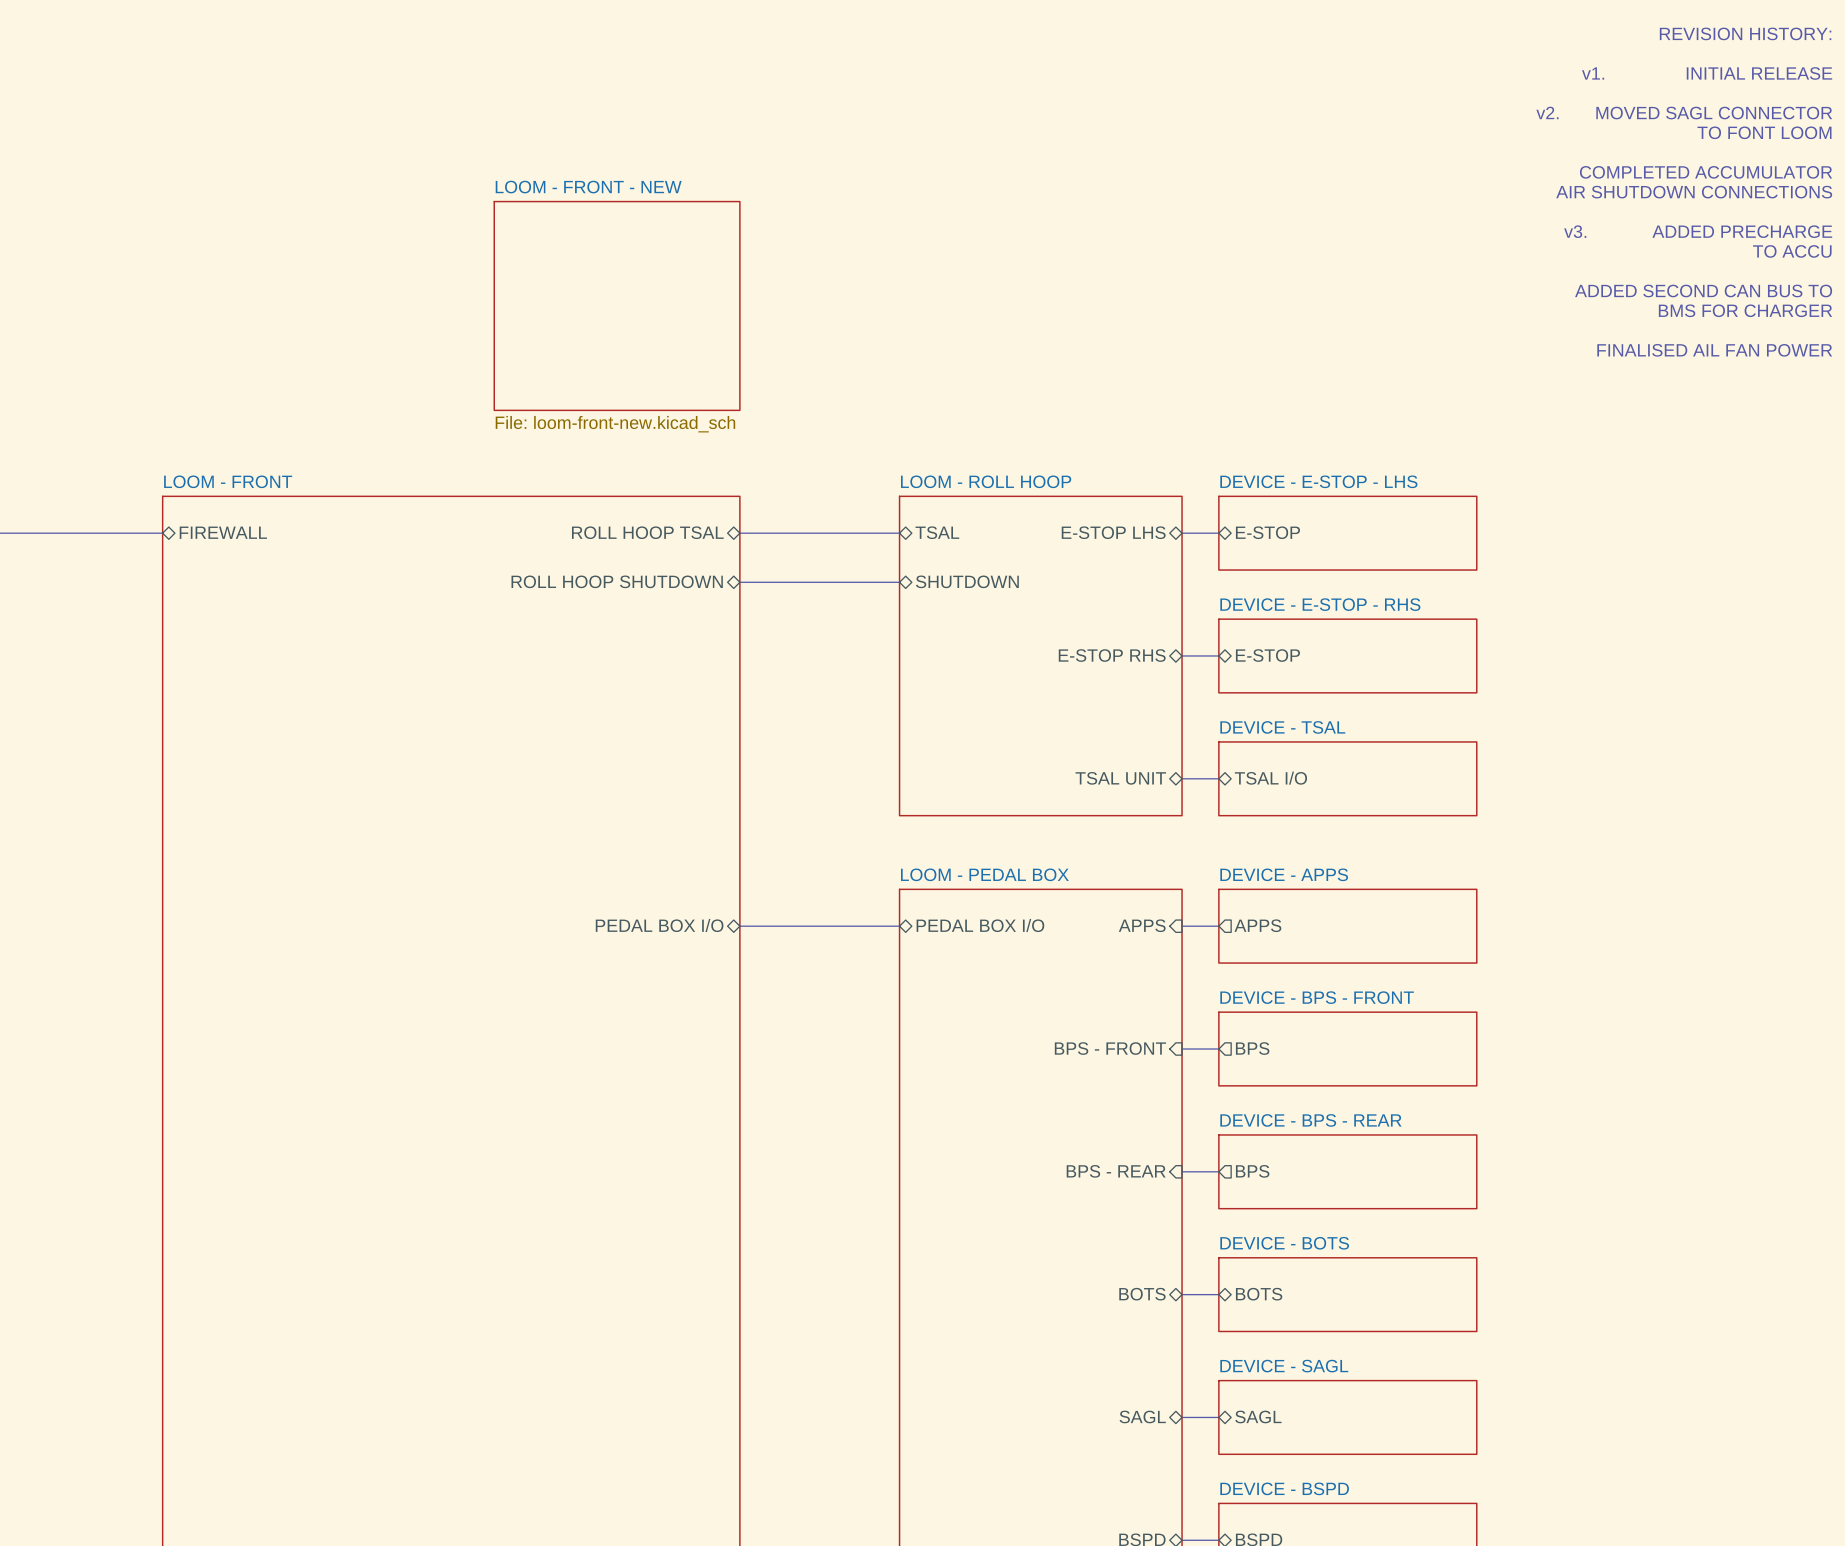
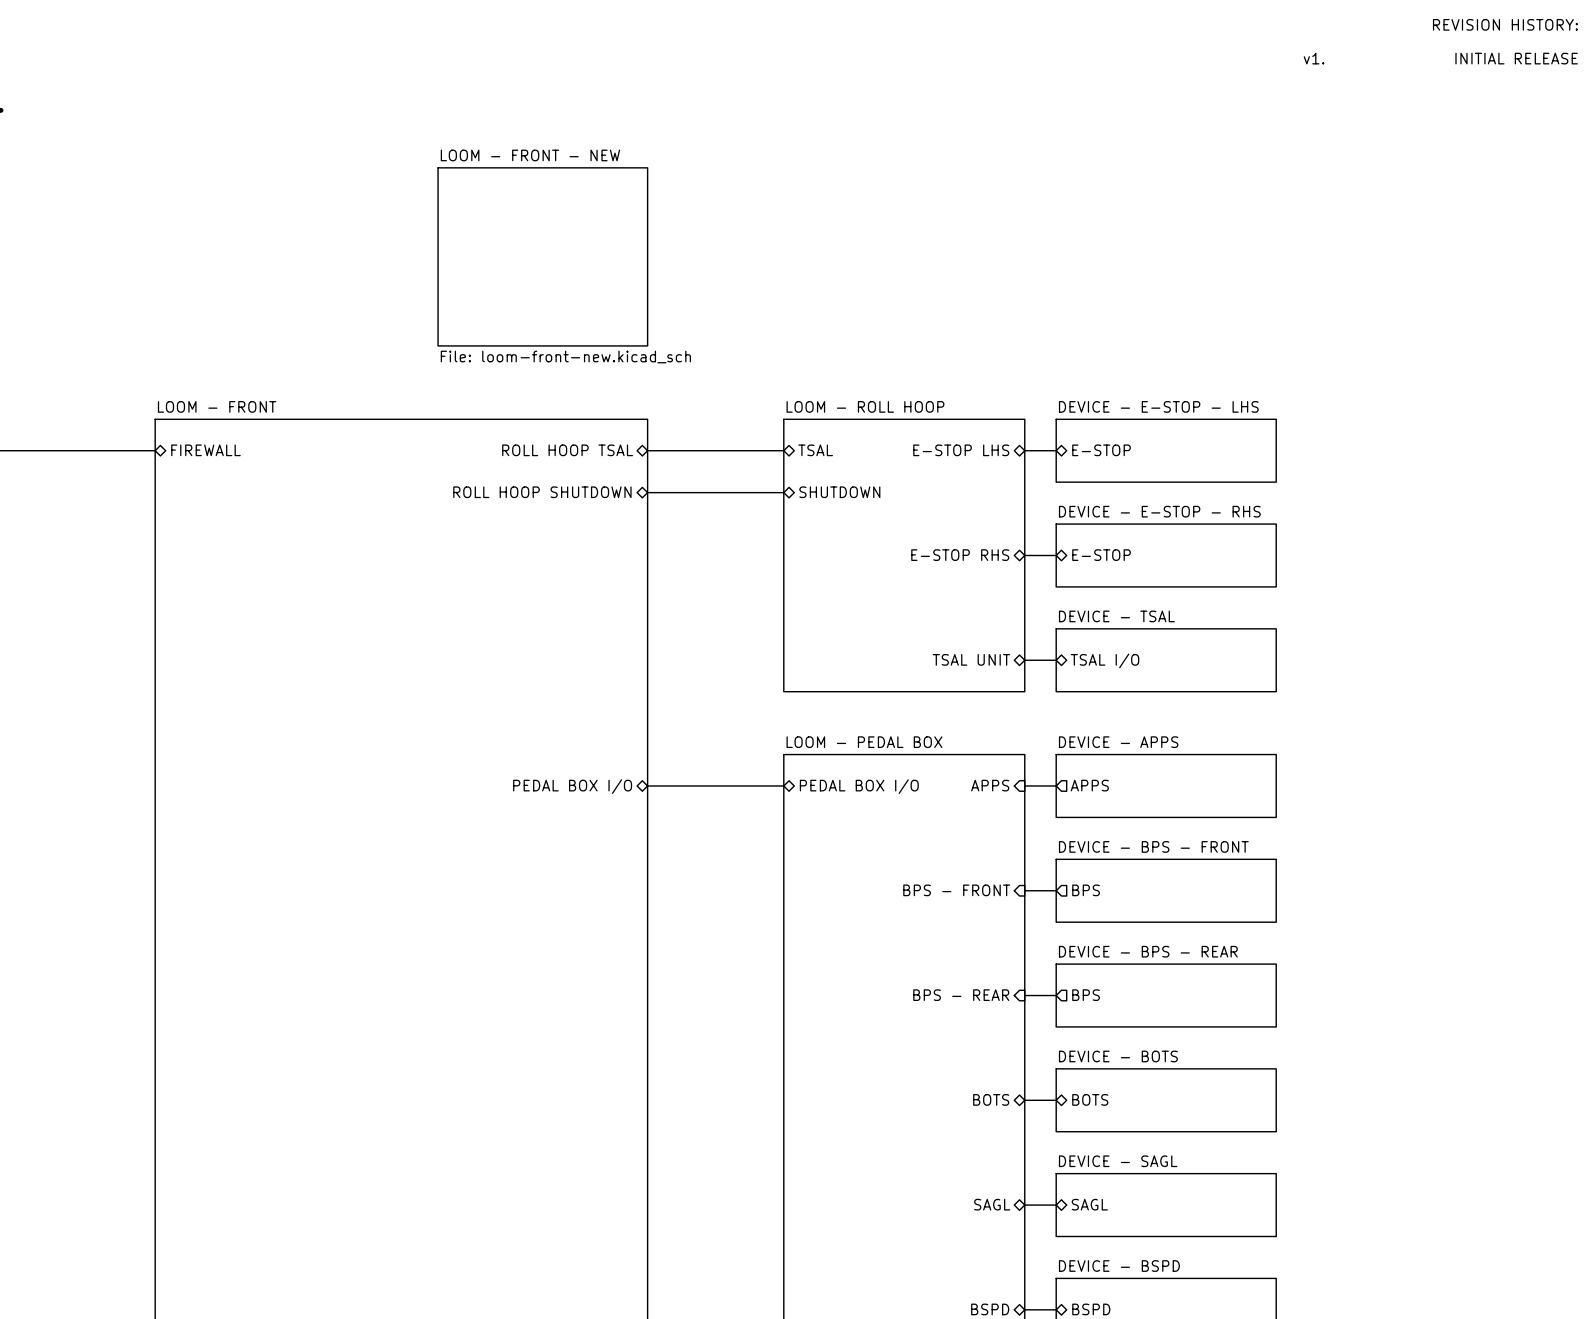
text: v2. MOVED SAGL CONNECTOR (1684, 113) -> none
text: TO FONT LOOM (1764, 132) -> none
text: COMPLETED ACCUMULATOR (1706, 172) -> none
text: AIR SHUTDOWN CONNECTIONS (1694, 192) -> none
text: v3. ADDED PRECHARGE (1698, 231) -> none
text: TO ACCU (1792, 251) -> none
text: ADDED SECOND CAN BUS TO (1703, 290) -> none
text: BMS FOR CHARGER (1745, 310) -> none
text: FINALISED AIL FAN POWER (1714, 350) -> none

